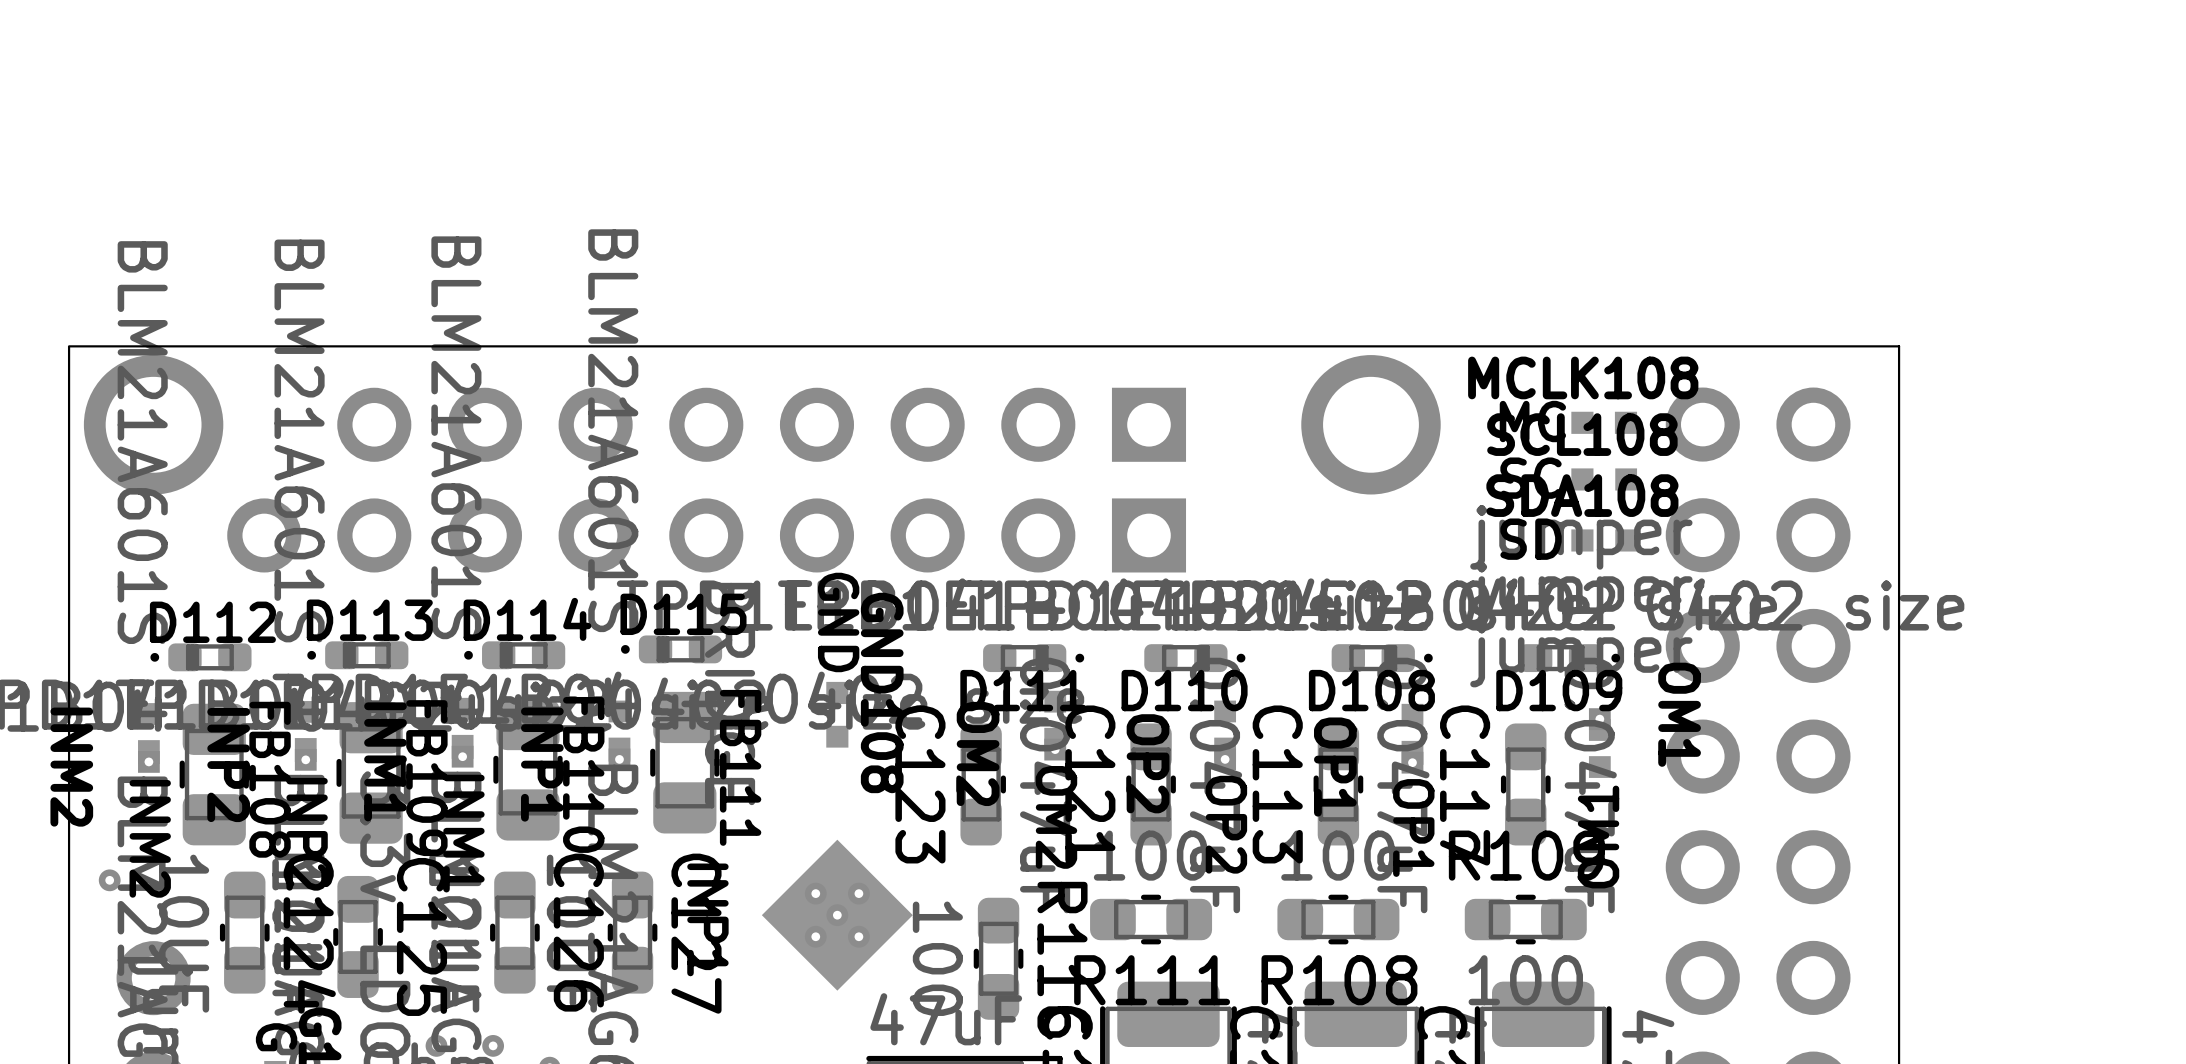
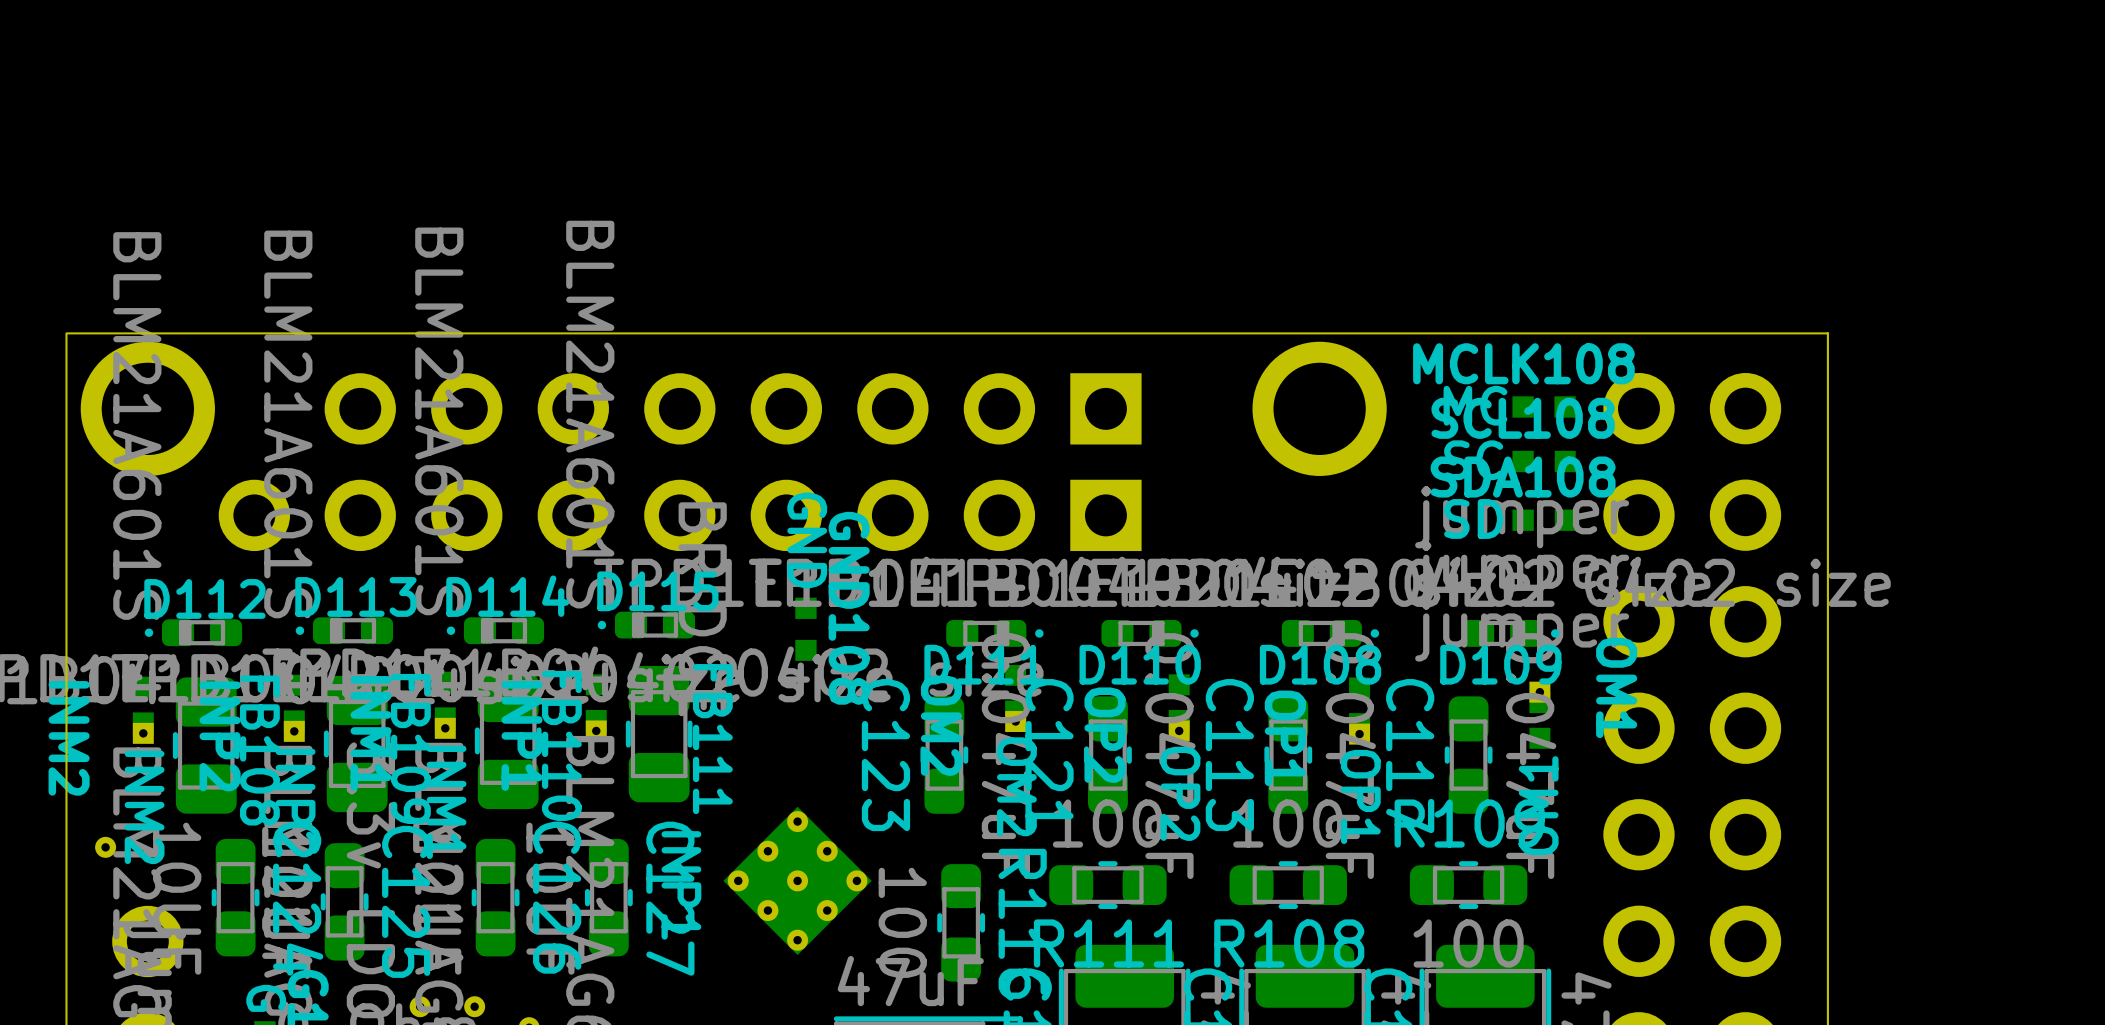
GND108 position: (837, 714) -> (805, 629)
part footprint: [761, 839, 913, 991] -> [723, 806, 872, 956]

